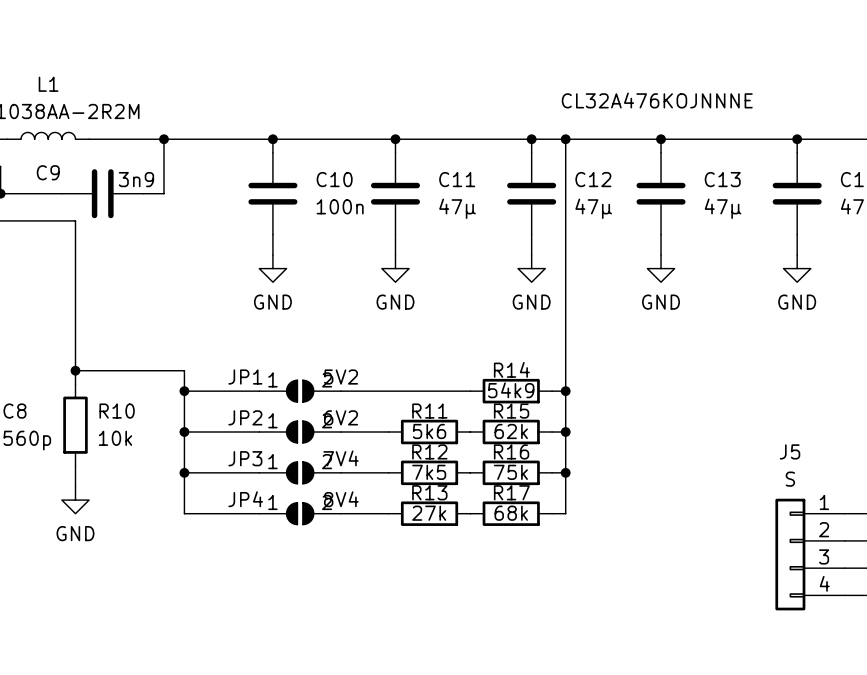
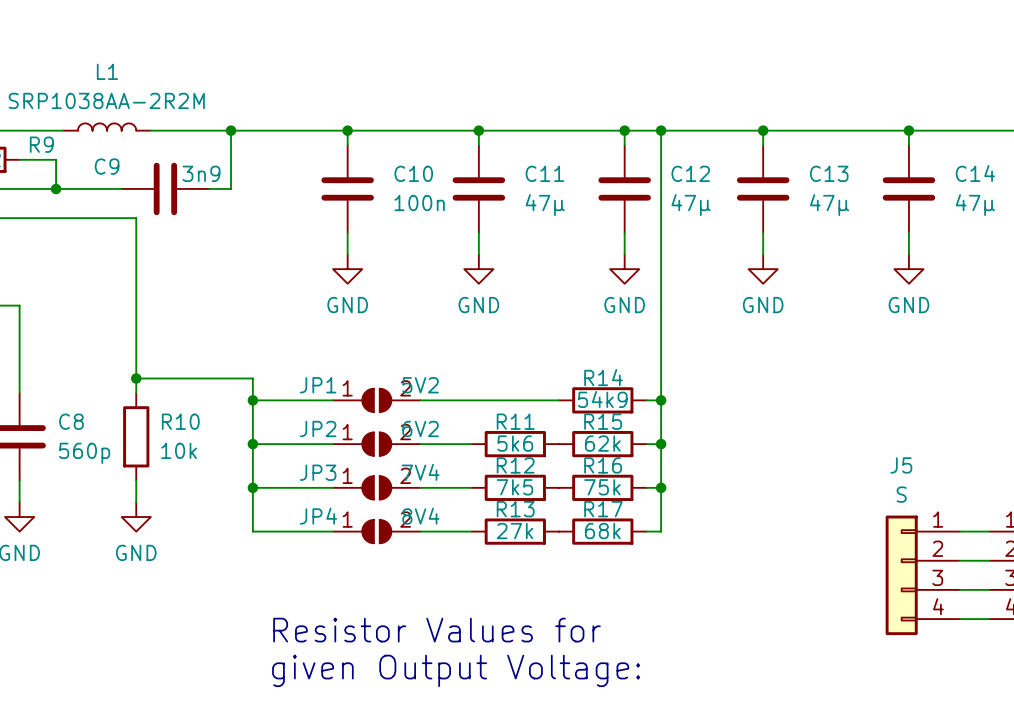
text: CL32A476KOJNNNE (657, 100) -> none
text: none -> Resistor Values for (436, 630)
text: none -> given Output Voltage: (456, 670)

